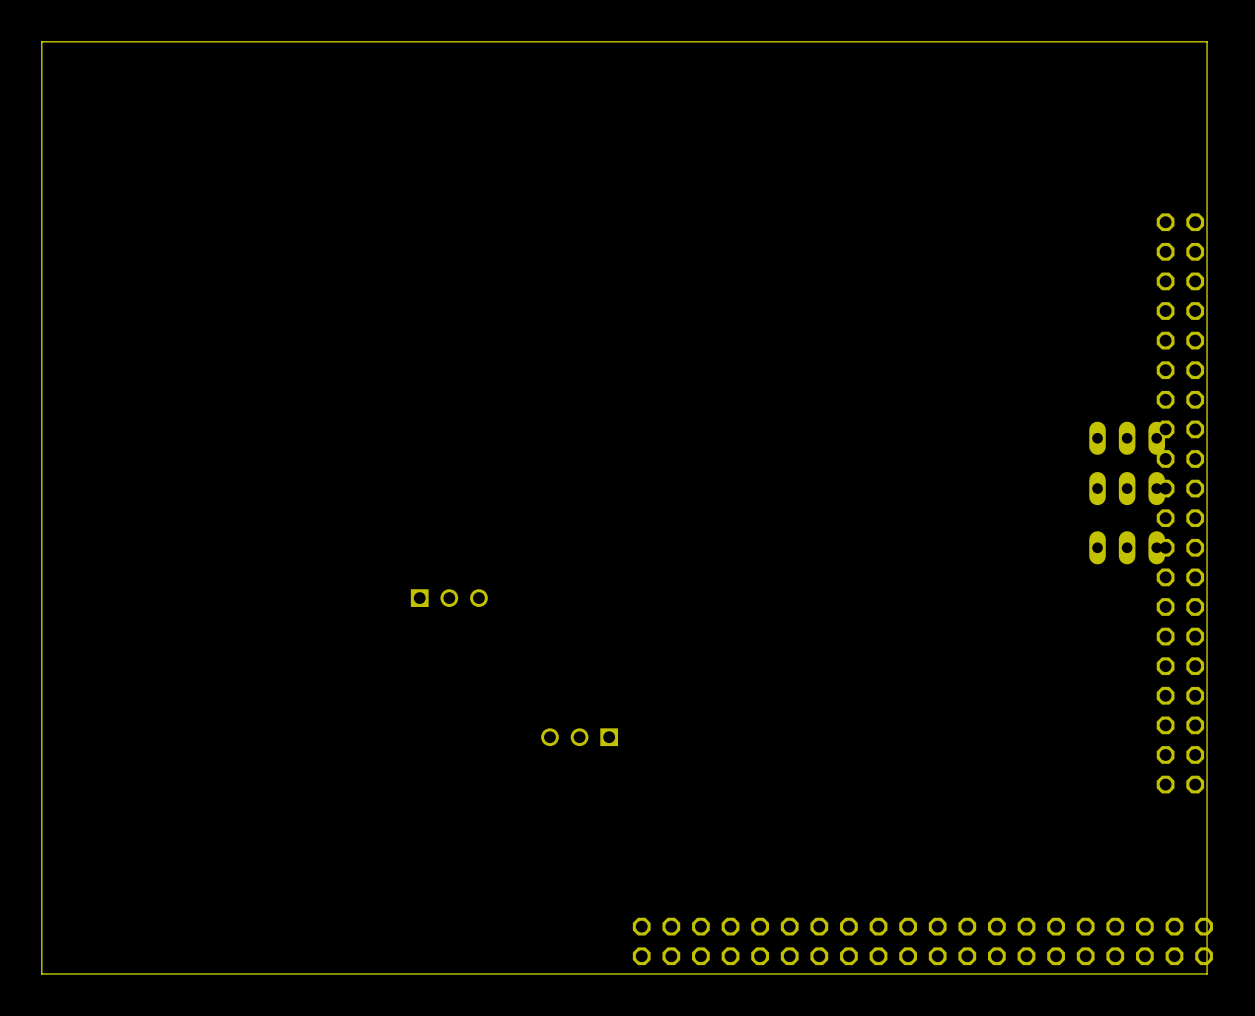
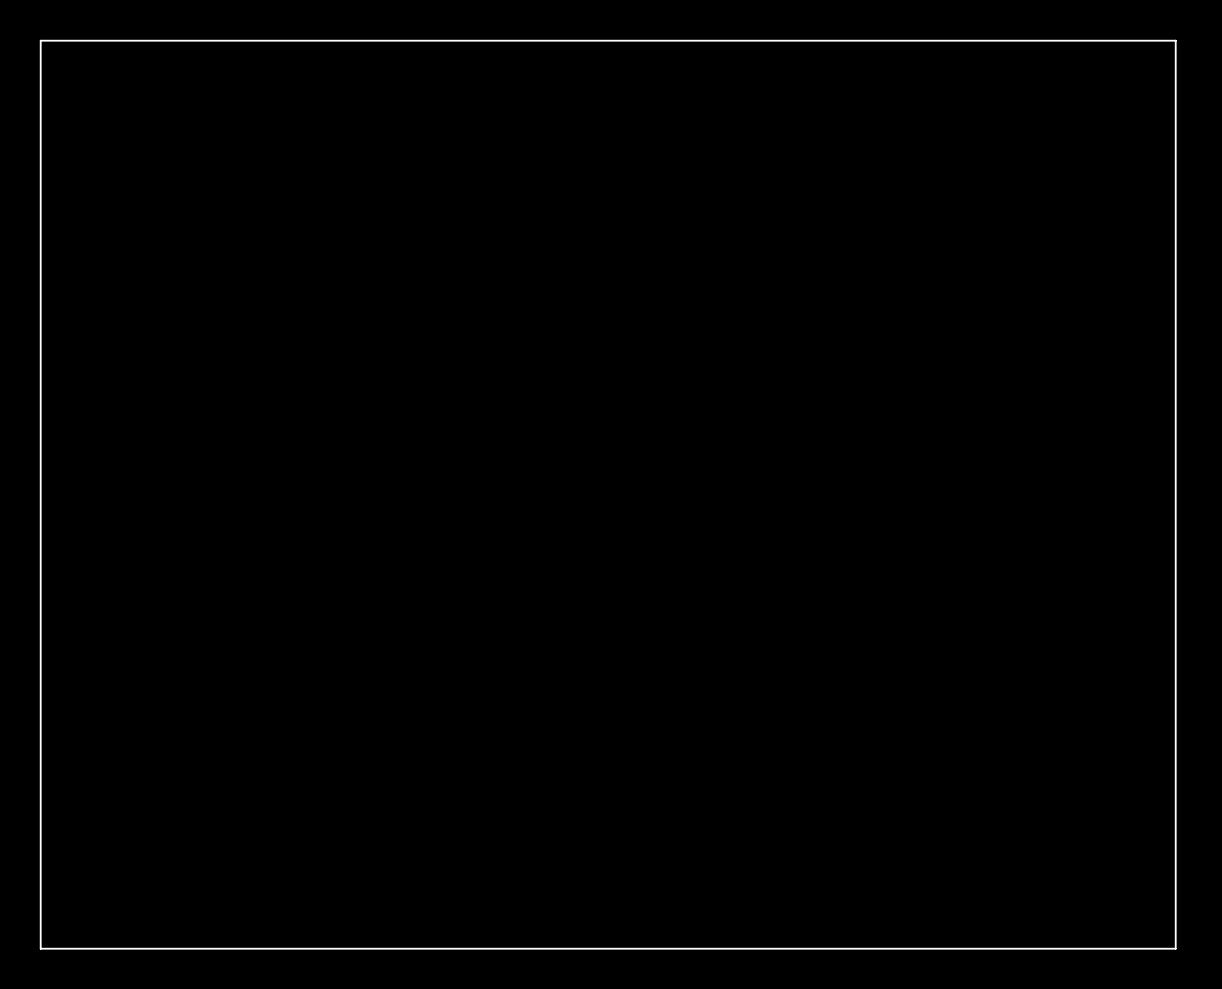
part: (1127, 438) -> none
part: (1127, 488) -> none
part: (1180, 503) -> none
part: (1127, 547) -> none
part: (449, 598) -> none
part: (579, 737) -> none
part: (922, 941) -> none

